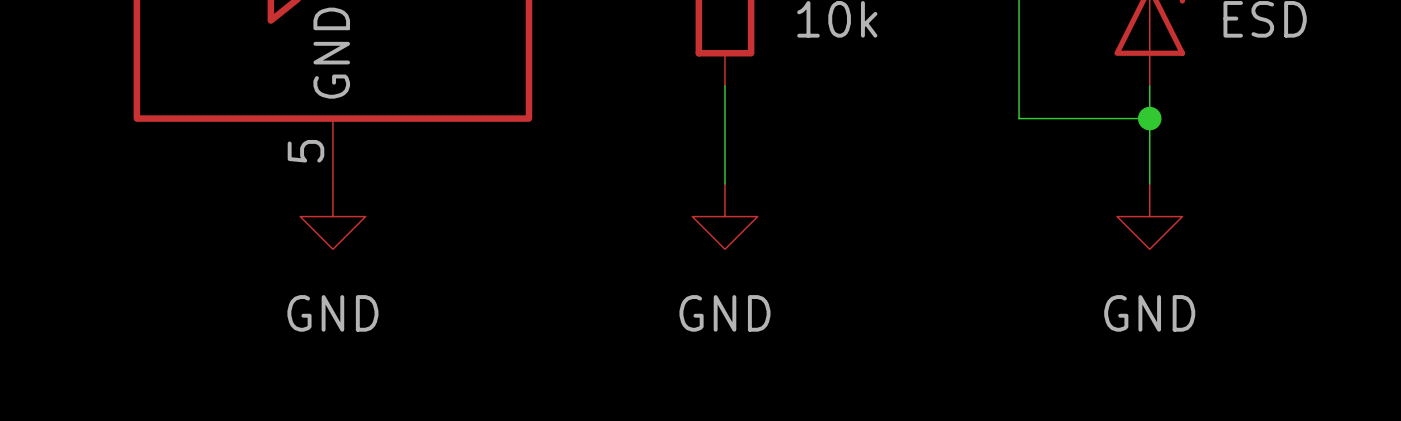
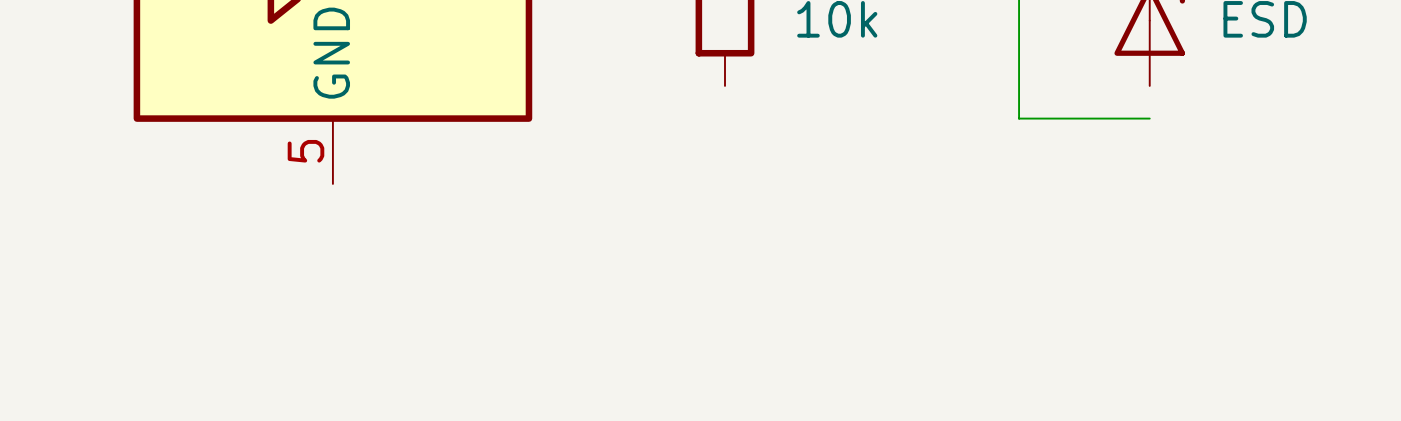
wire: (725, 85) (725, 183) -> none
wire: (1149, 85) (1149, 183) -> none
junction: (1149, 118) -> none
power symbol: GND (332, 216) -> none
power symbol: GND (725, 216) -> none
power symbol: GND (1149, 216) -> none

